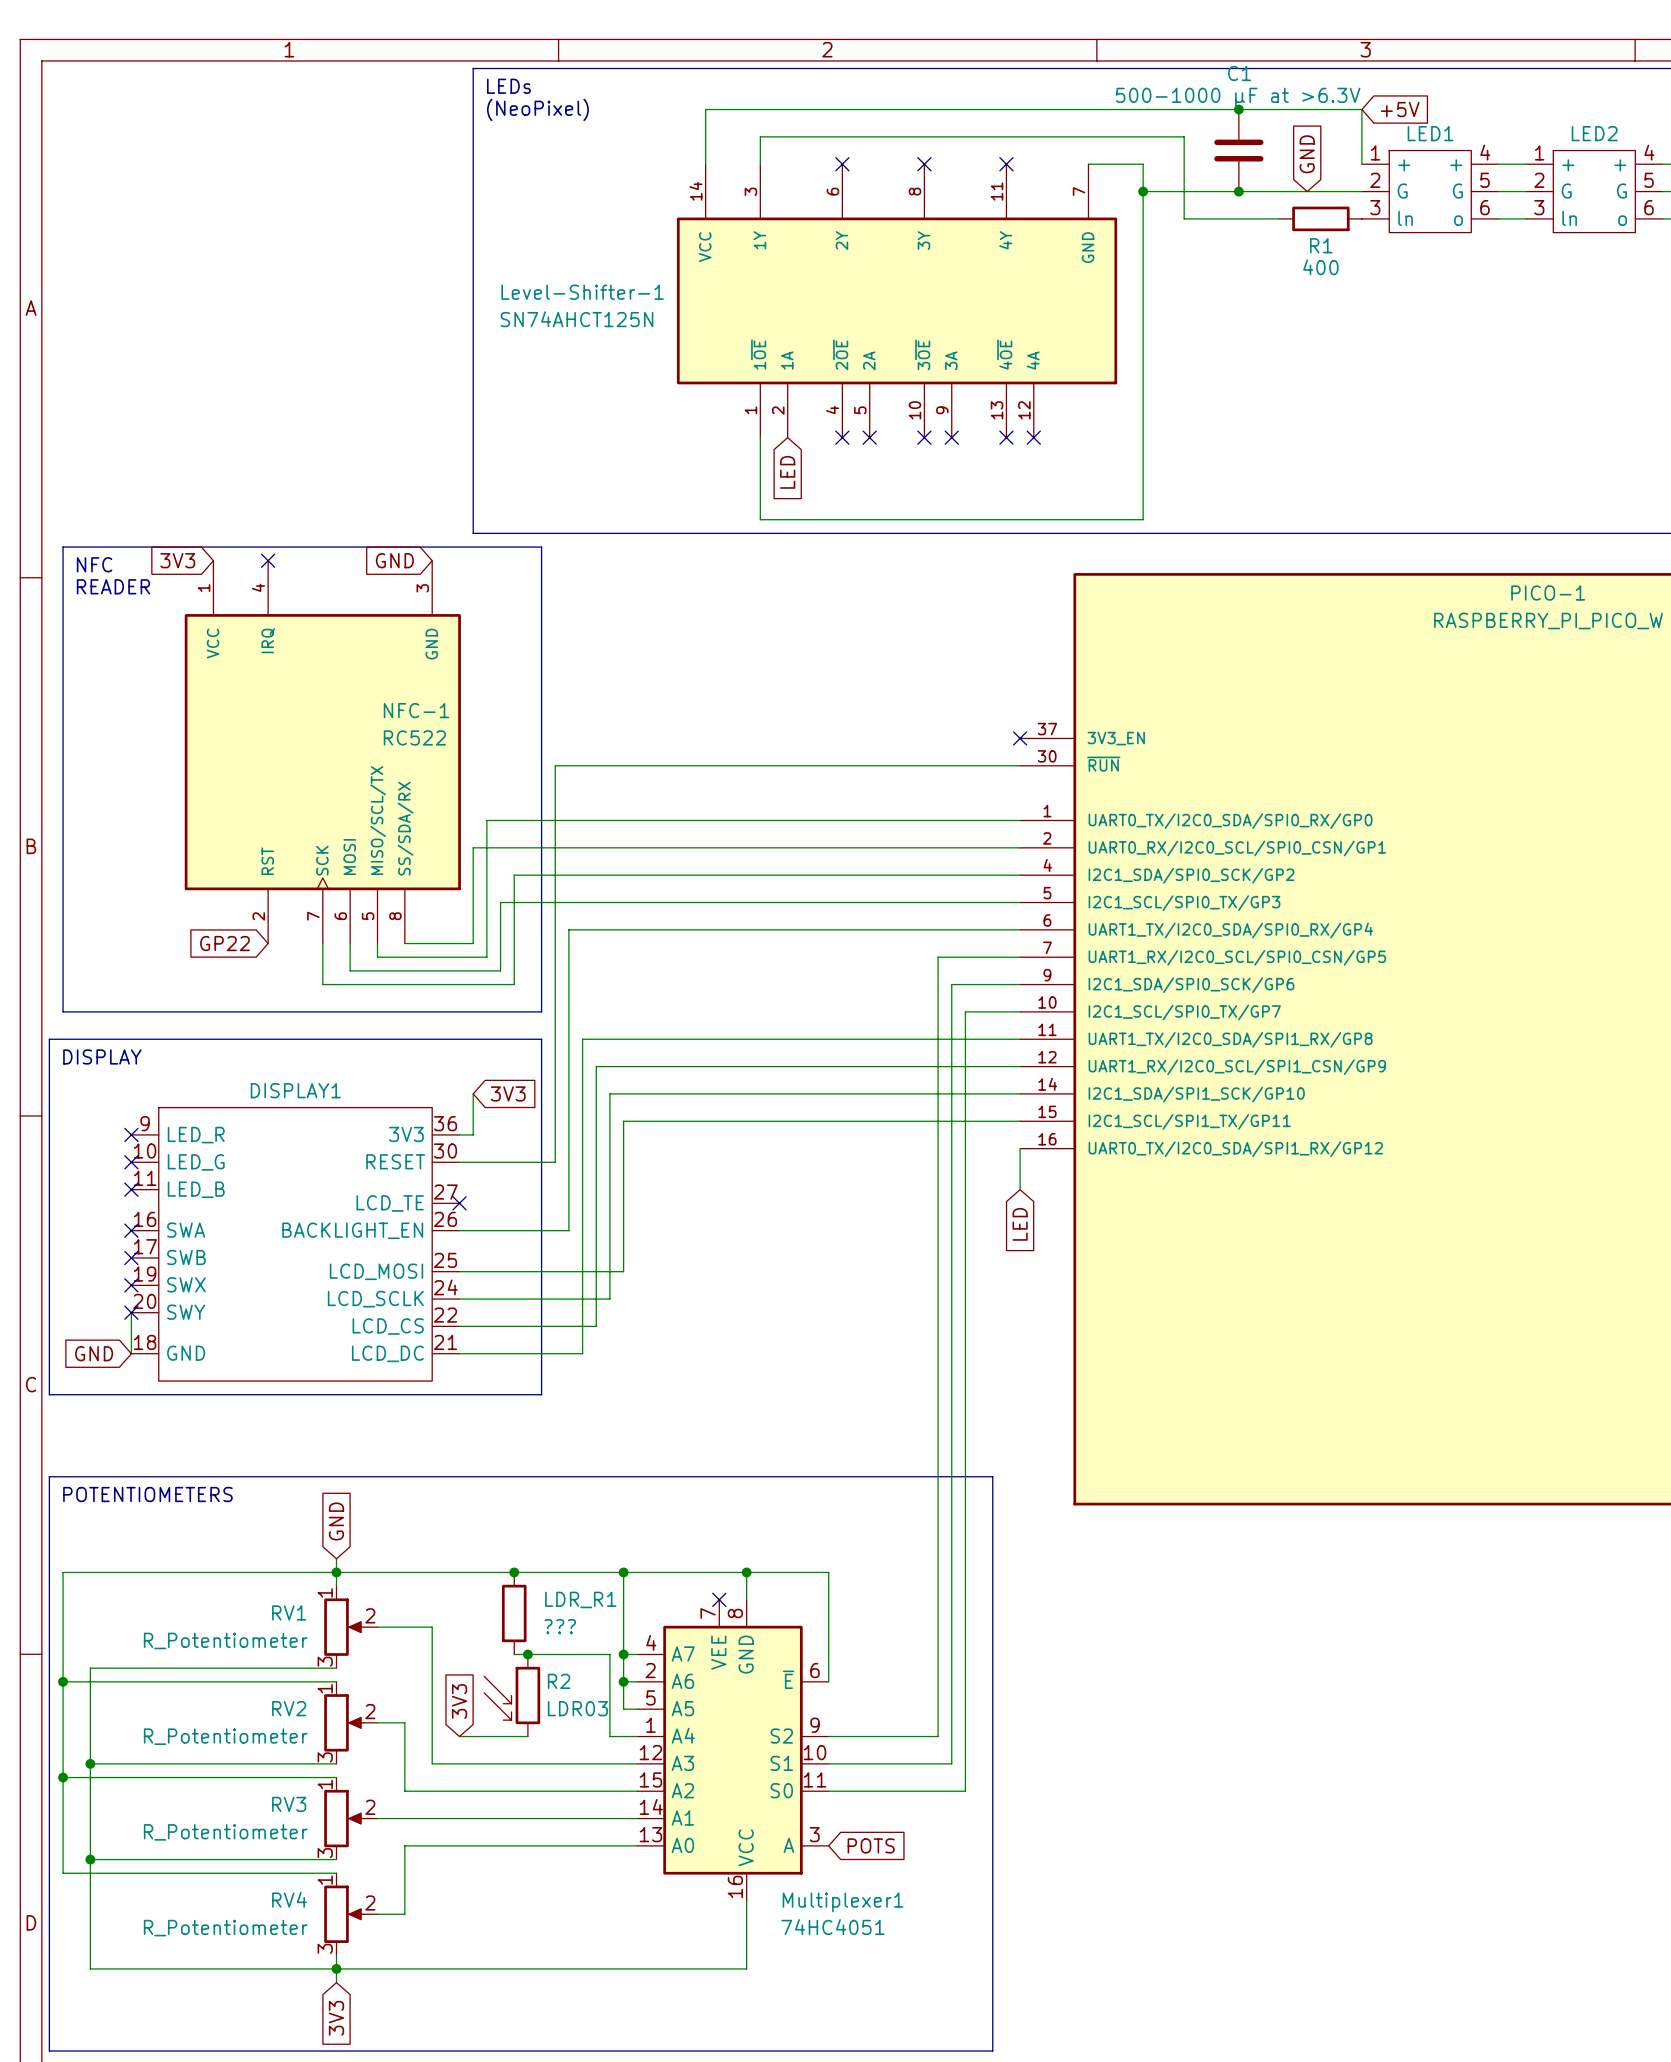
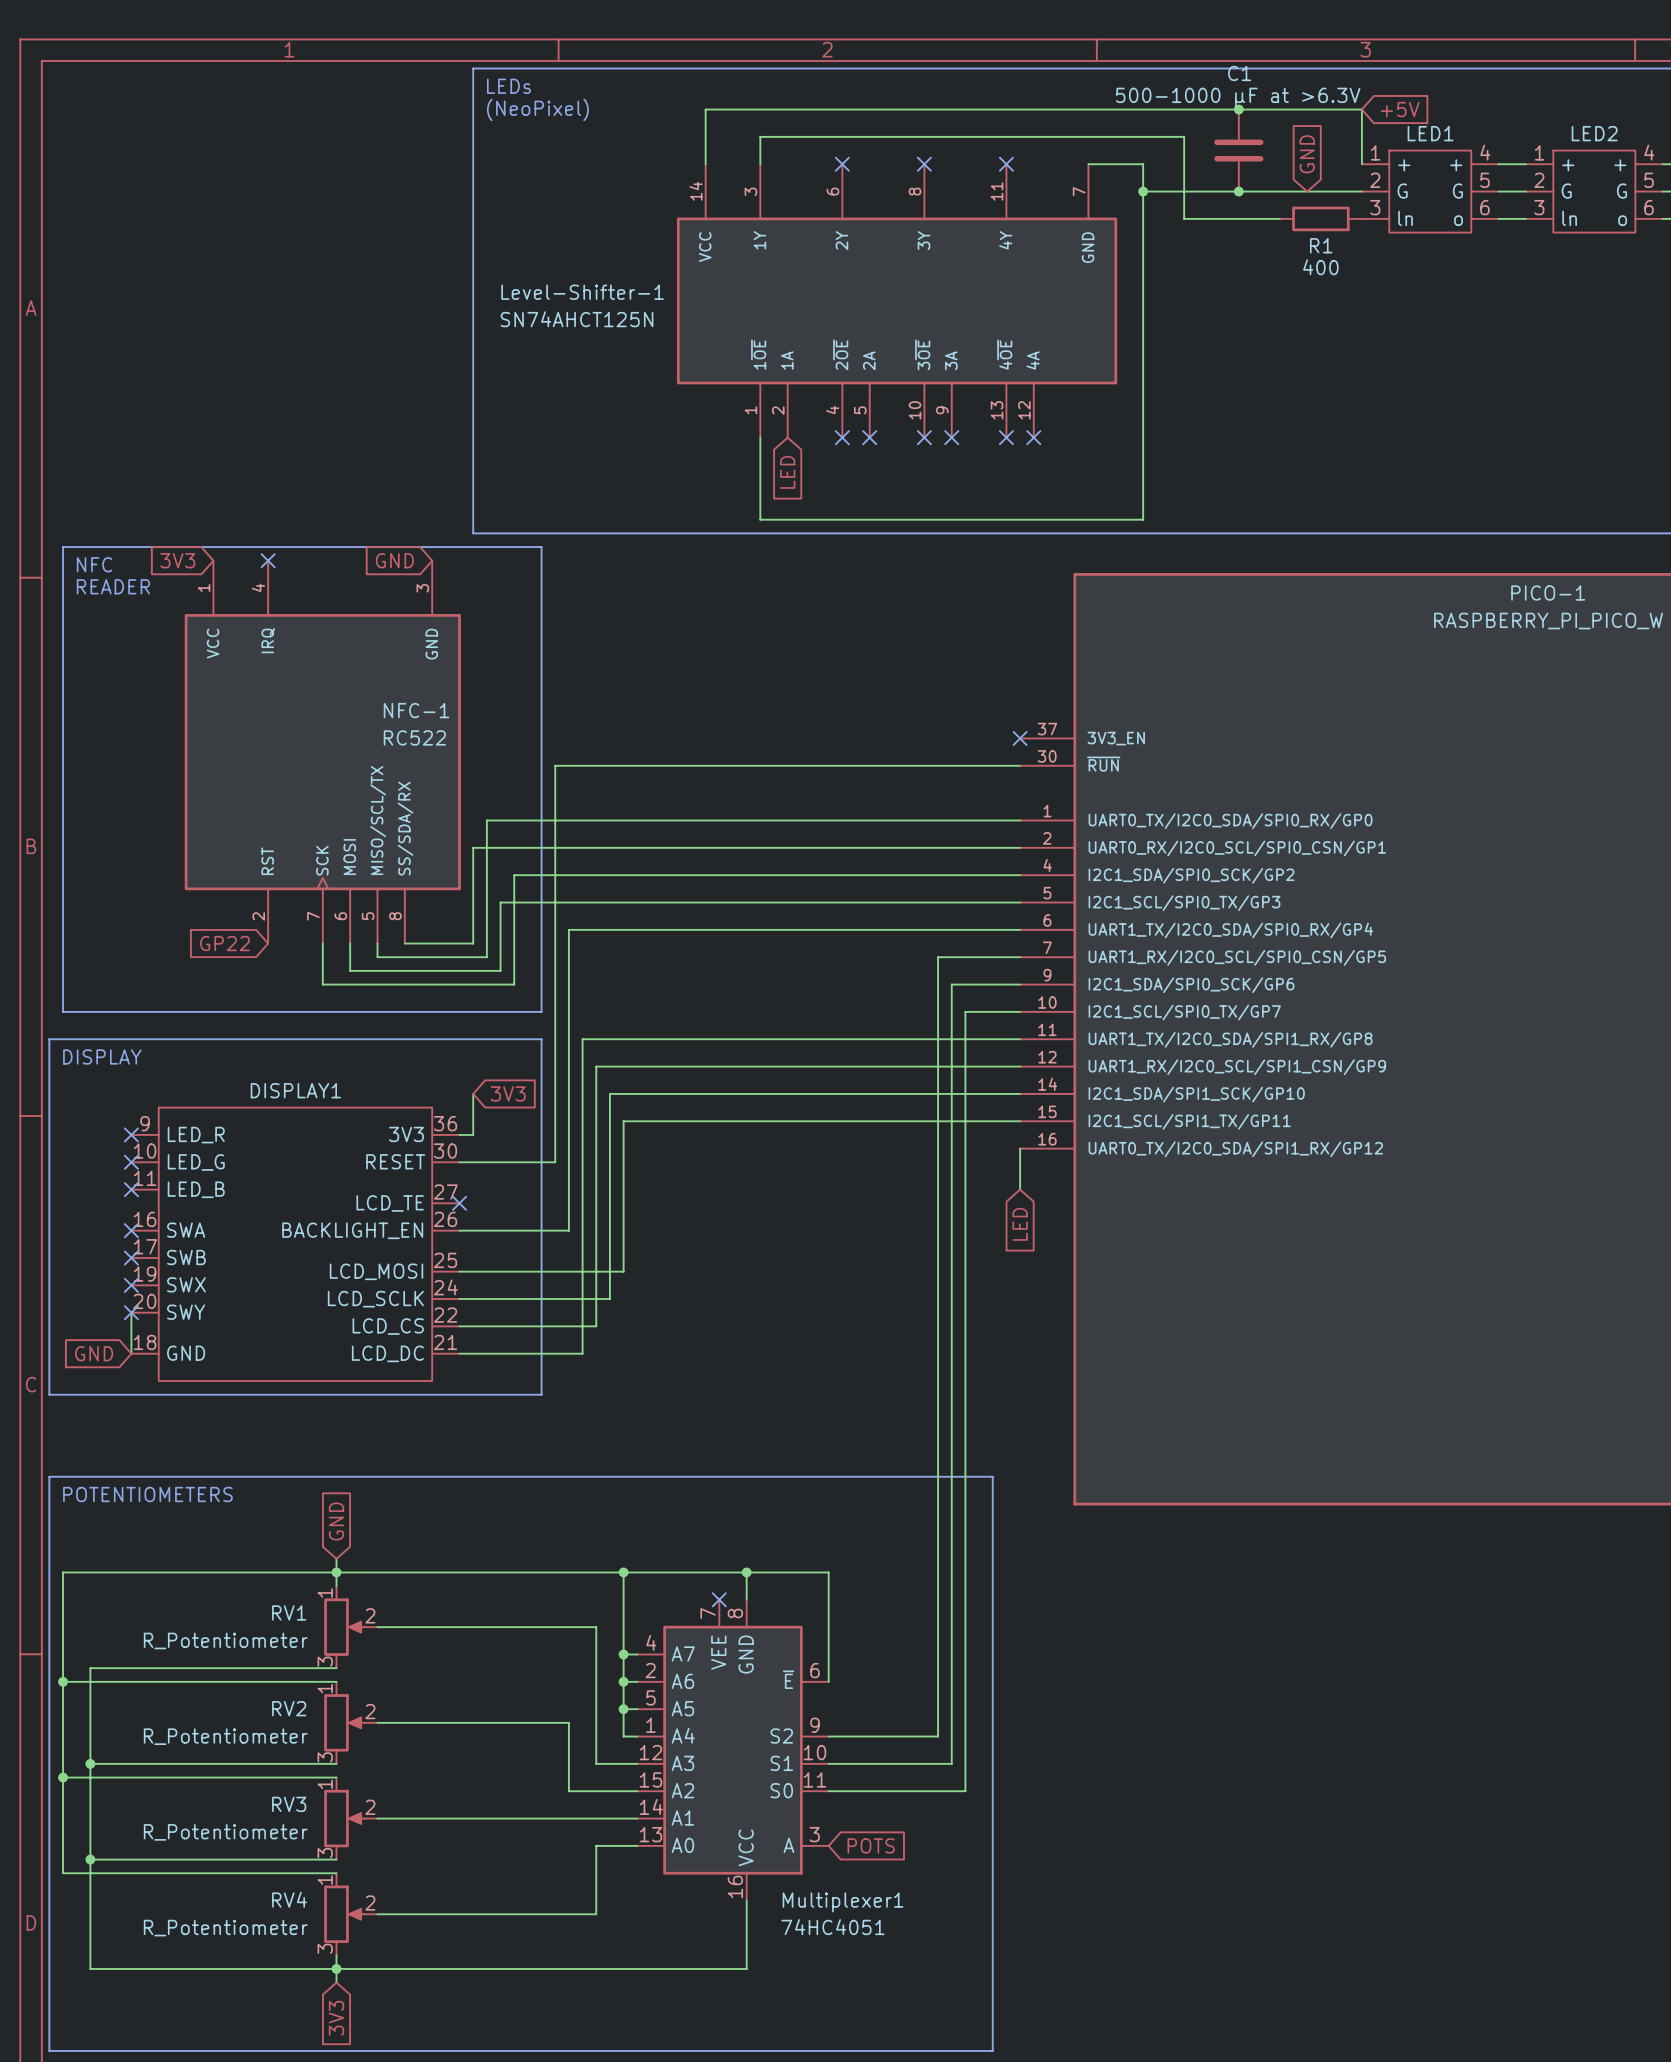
junction: (514, 1572) -> none
LDR_R1: ??? (514, 1613) -> none
wire: (432, 1627) (432, 1763) (596, 1763) -> (432, 1627) (596, 1627) (596, 1763)
wire: (514, 1654) (609, 1654) (609, 1736) (623, 1736) -> (623, 1709) (623, 1736)
junction: (527, 1654) -> none
R2: LDR03 (512, 1695) -> none
global label: 3V3 (459, 1701) -> none
junction: none -> (623, 1709)
wire: (404, 1722) (404, 1791) (568, 1791) -> (404, 1722) (568, 1722) (568, 1791)
wire: (459, 1736) (527, 1736) -> none
wire: (596, 1845) (404, 1845) (404, 1914) -> (596, 1845) (596, 1914) (404, 1914)

